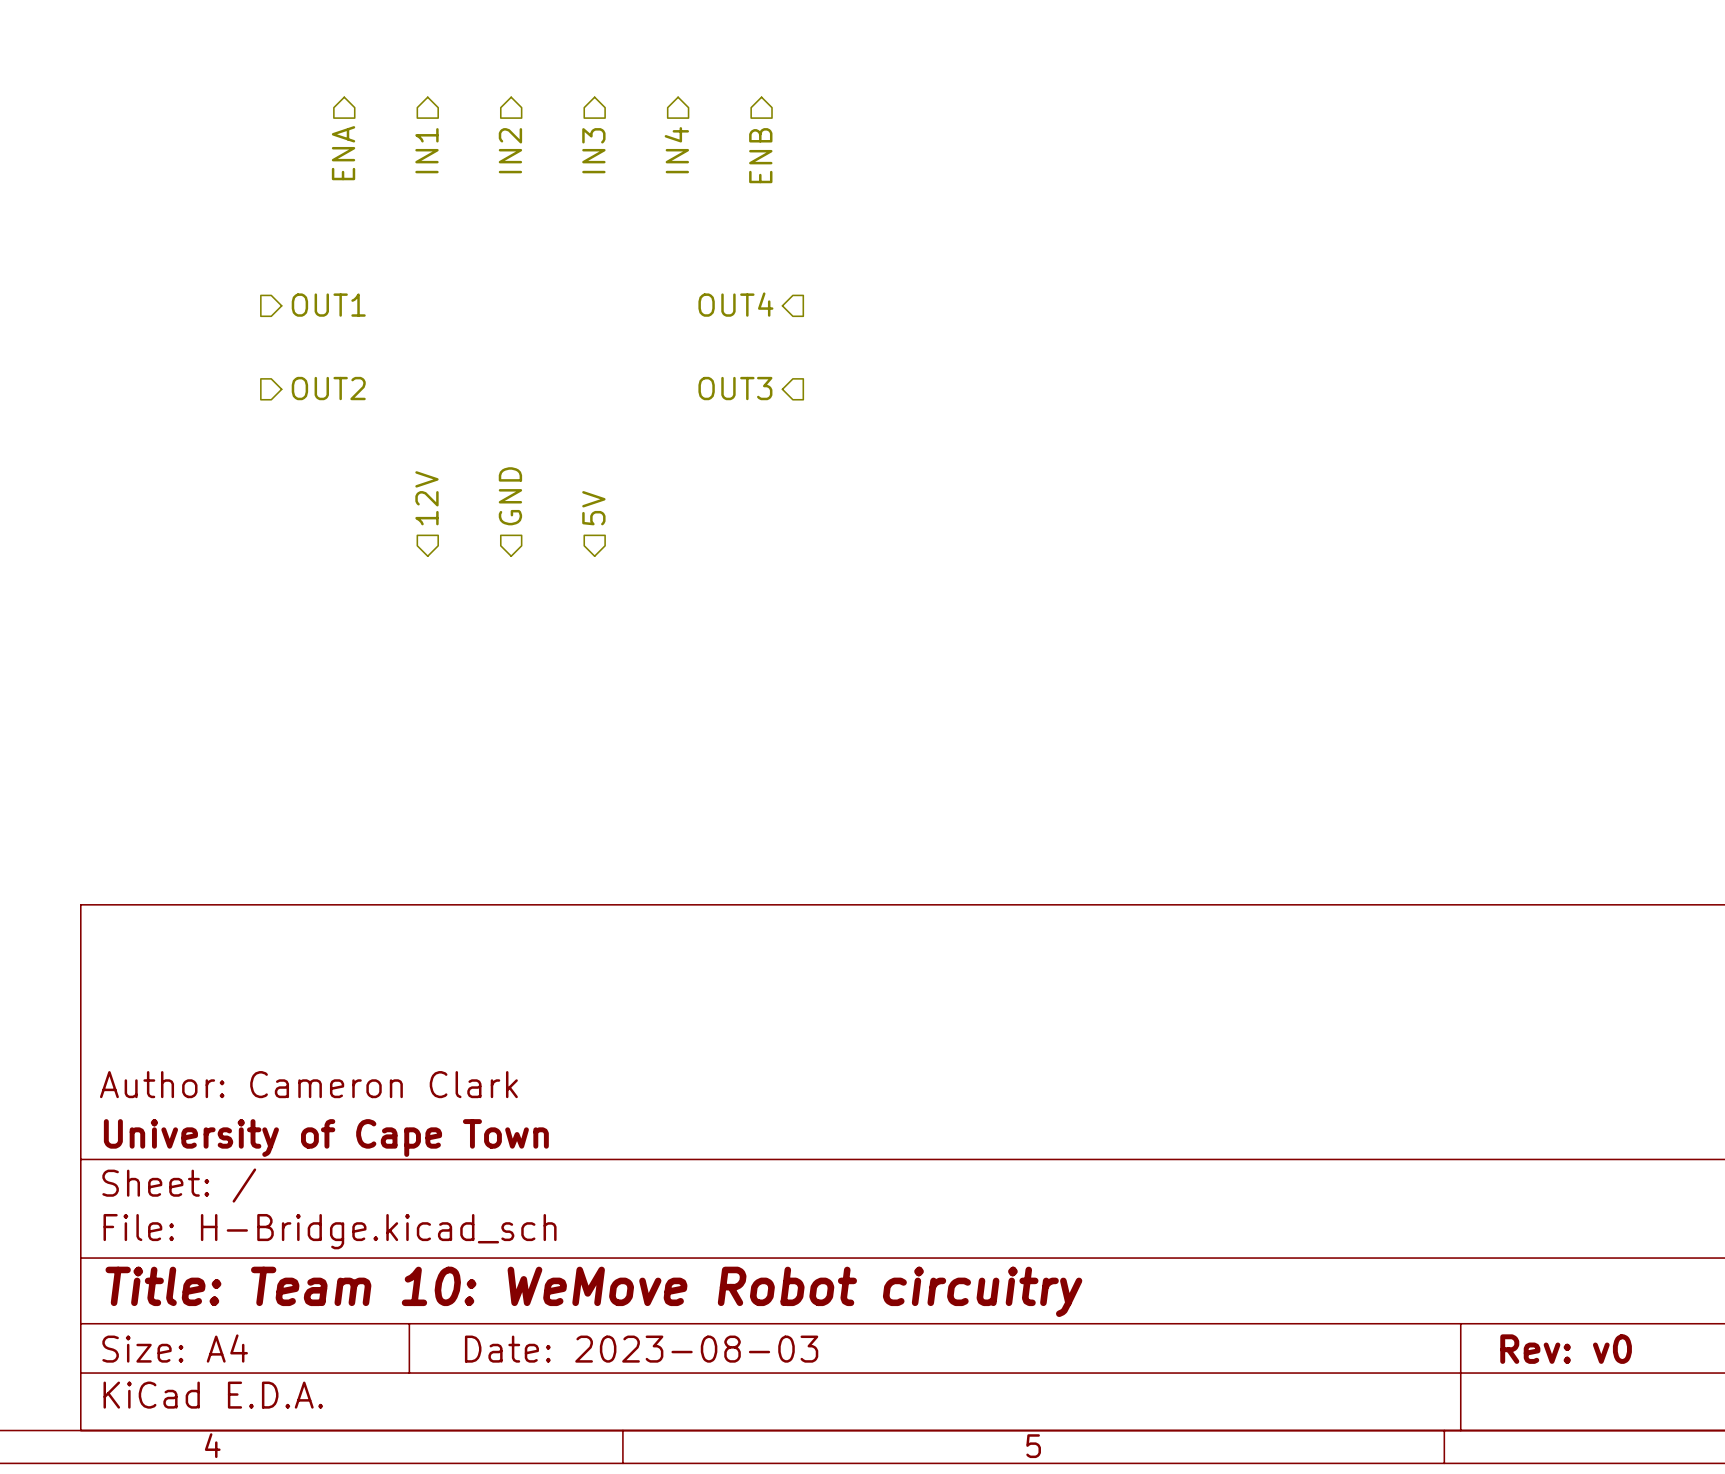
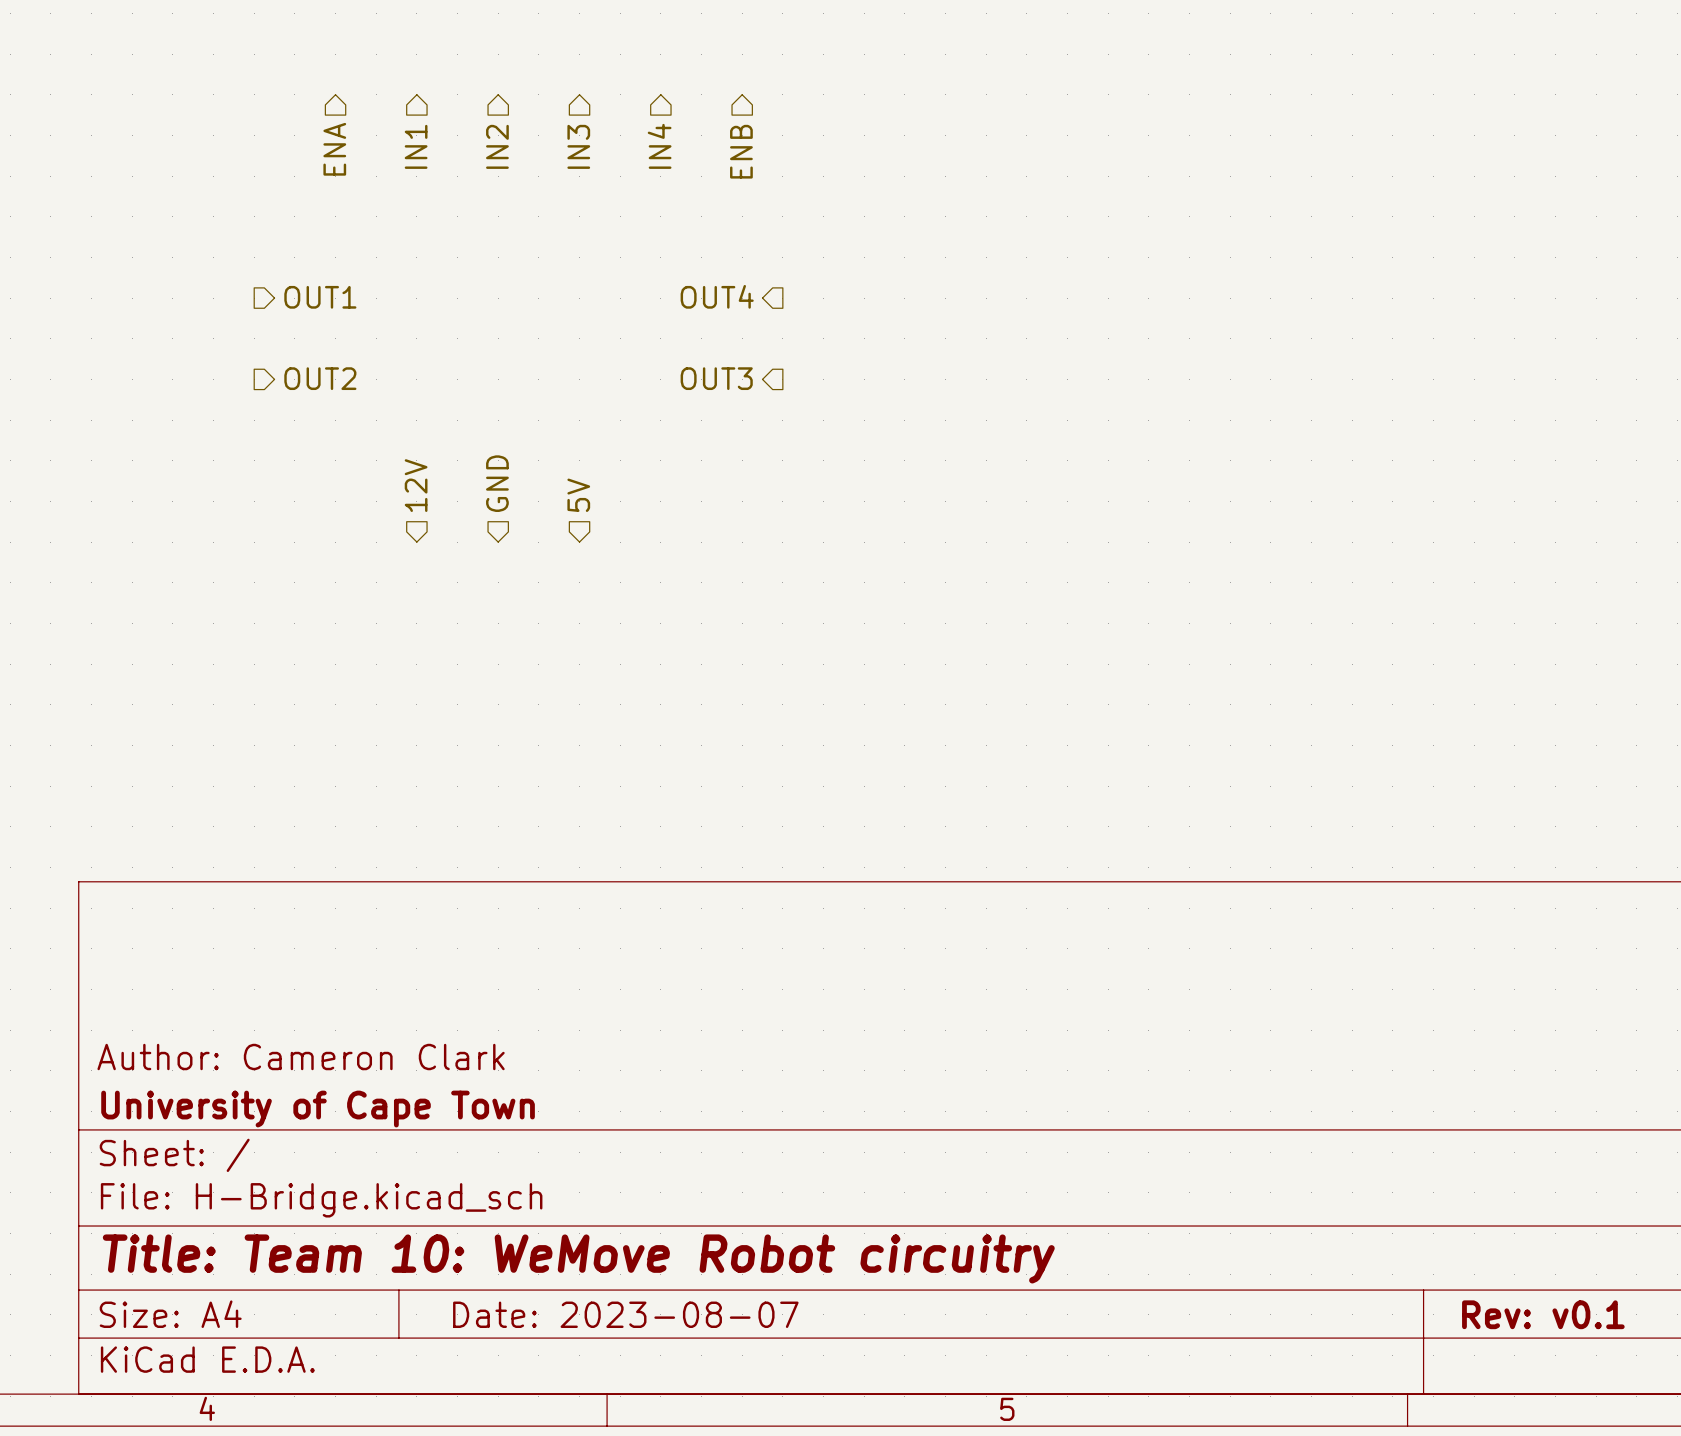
title block: Date: 2023-08-03 (641, 1349) -> Date: 2023-08-07 (625, 1314)
title block: Rev: v0 (1566, 1349) -> Rev: v0.1 (1543, 1314)

